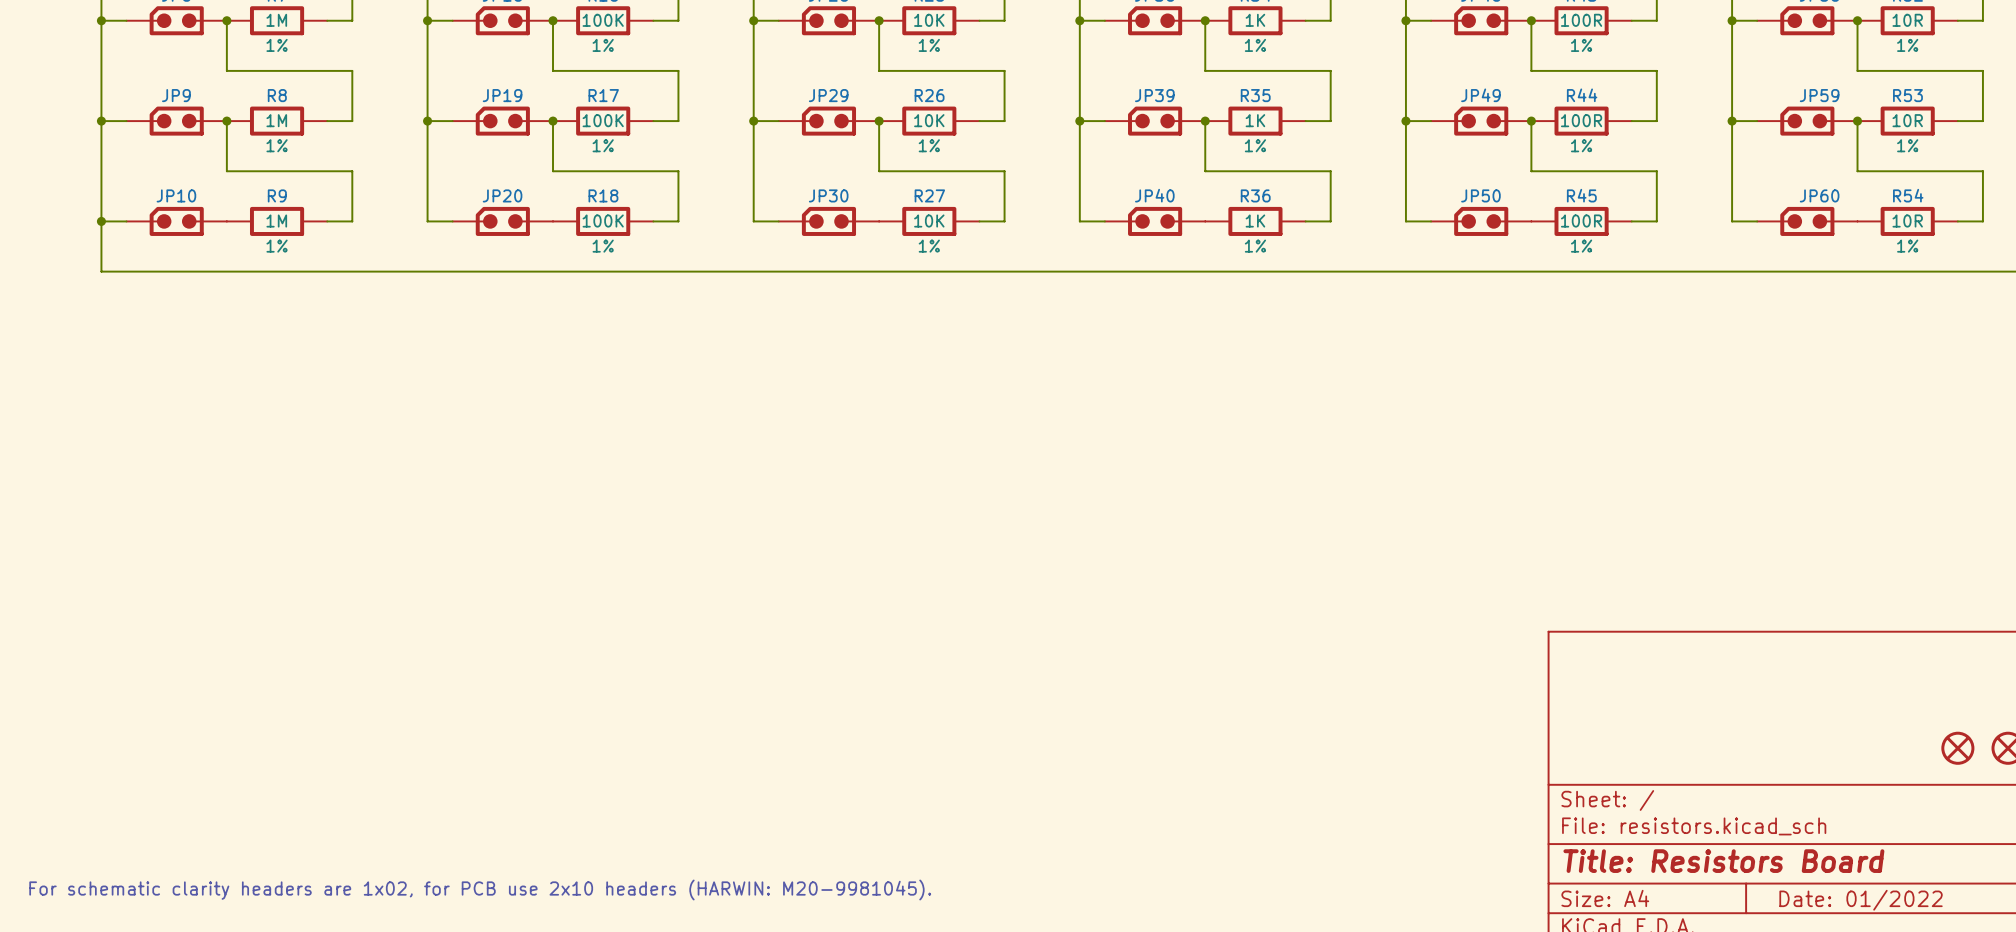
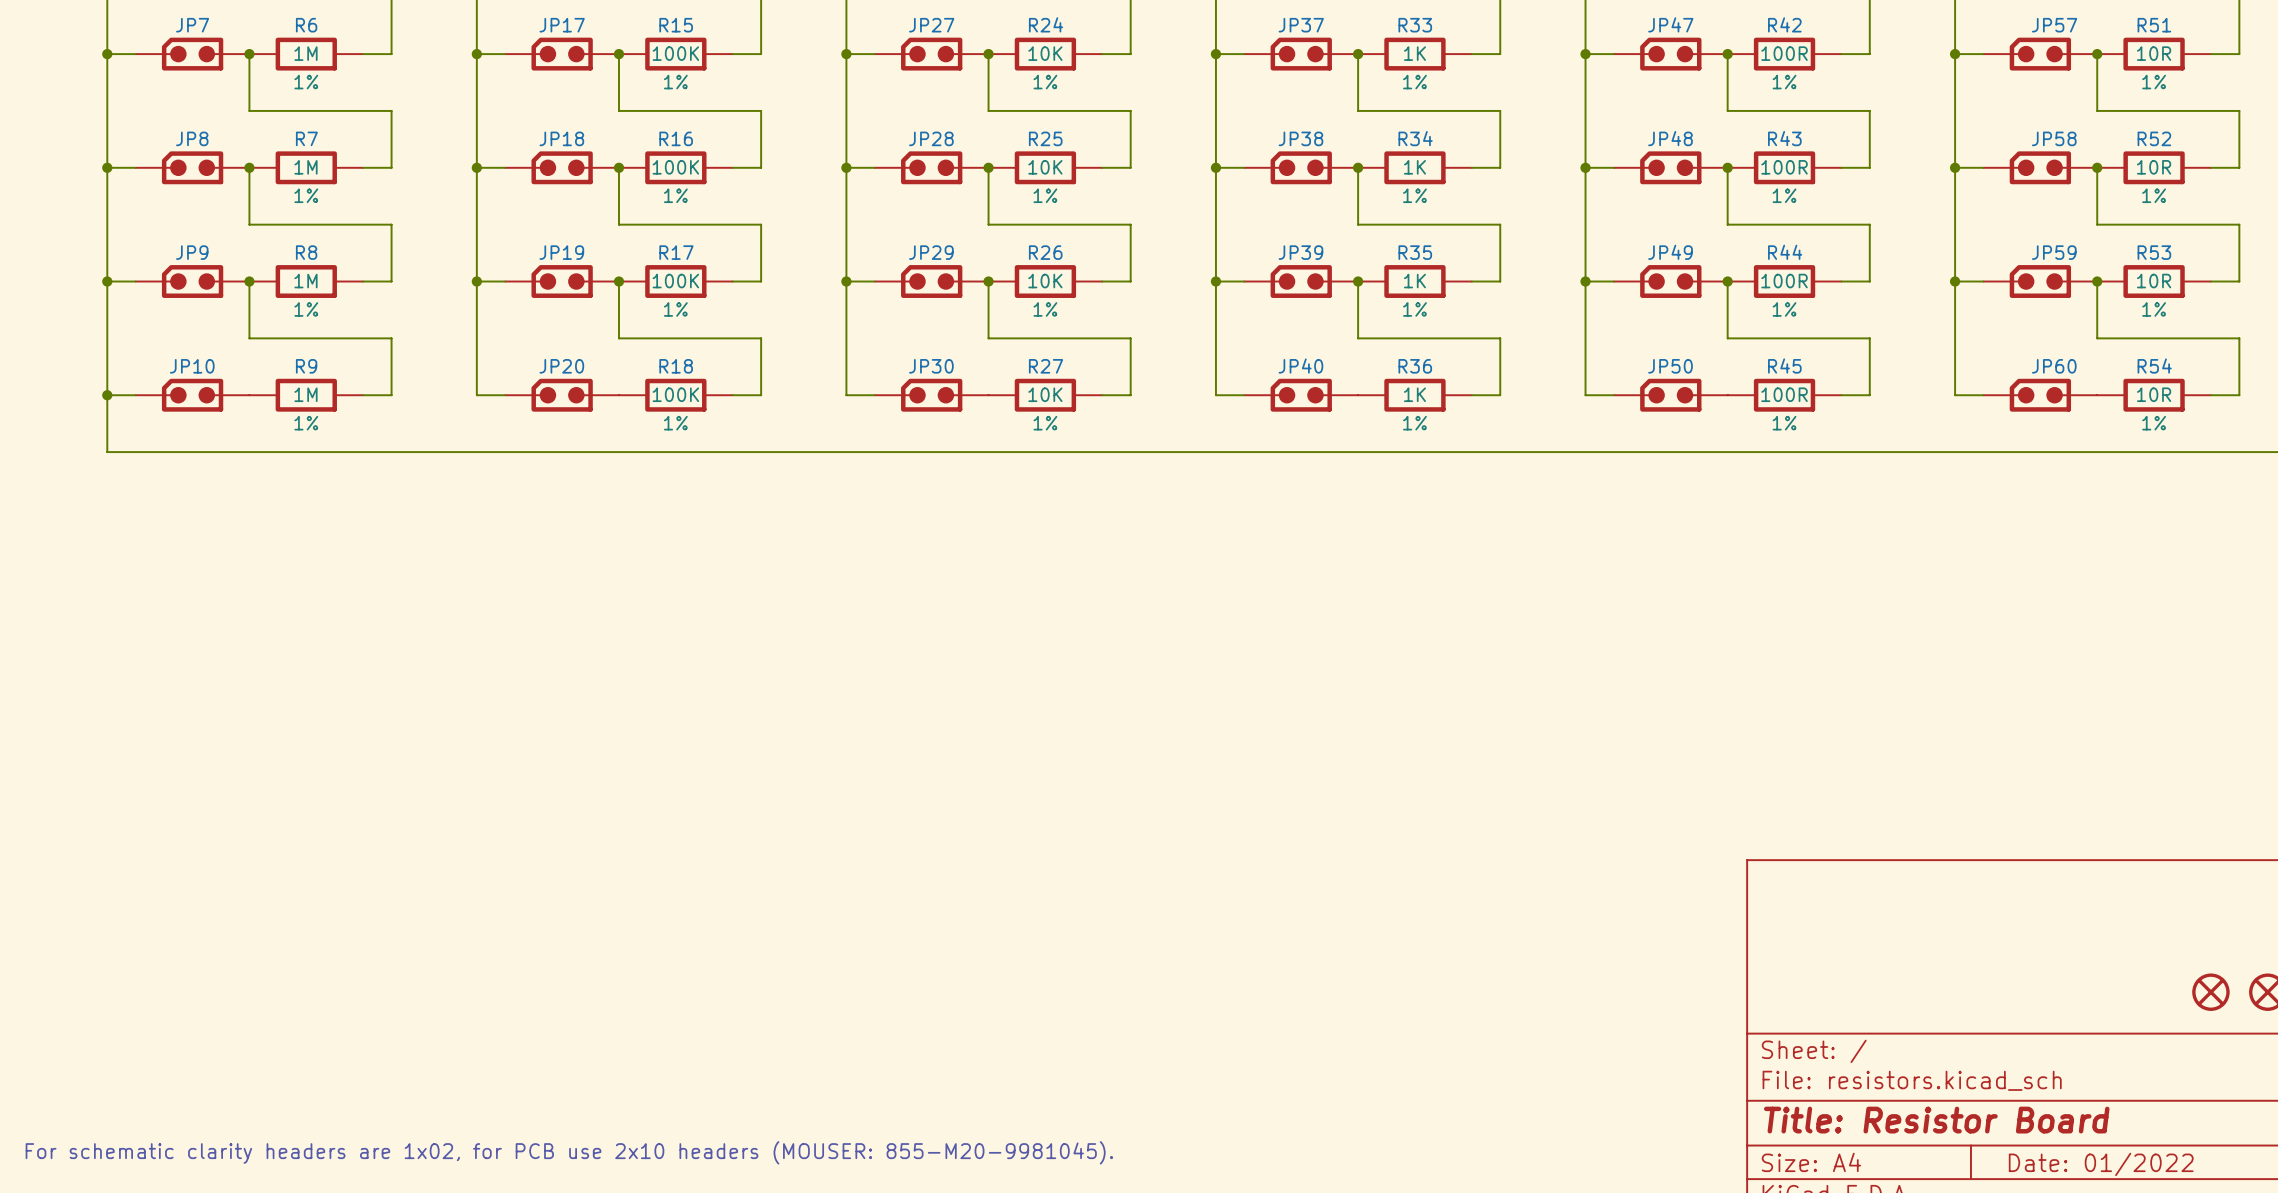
title block: Title: Resistors Board (1723, 861) -> Title: Resistor Board (1936, 1120)
text: For schematic clarity headers are 1x02, for PCB use 2x10 headers (HARWIN: M20-9981045). (480, 890) -> For schematic clarity headers are 1x02, for PCB use 2x10 headers (MOUSER: 855-M20-9981045). (569, 1152)

